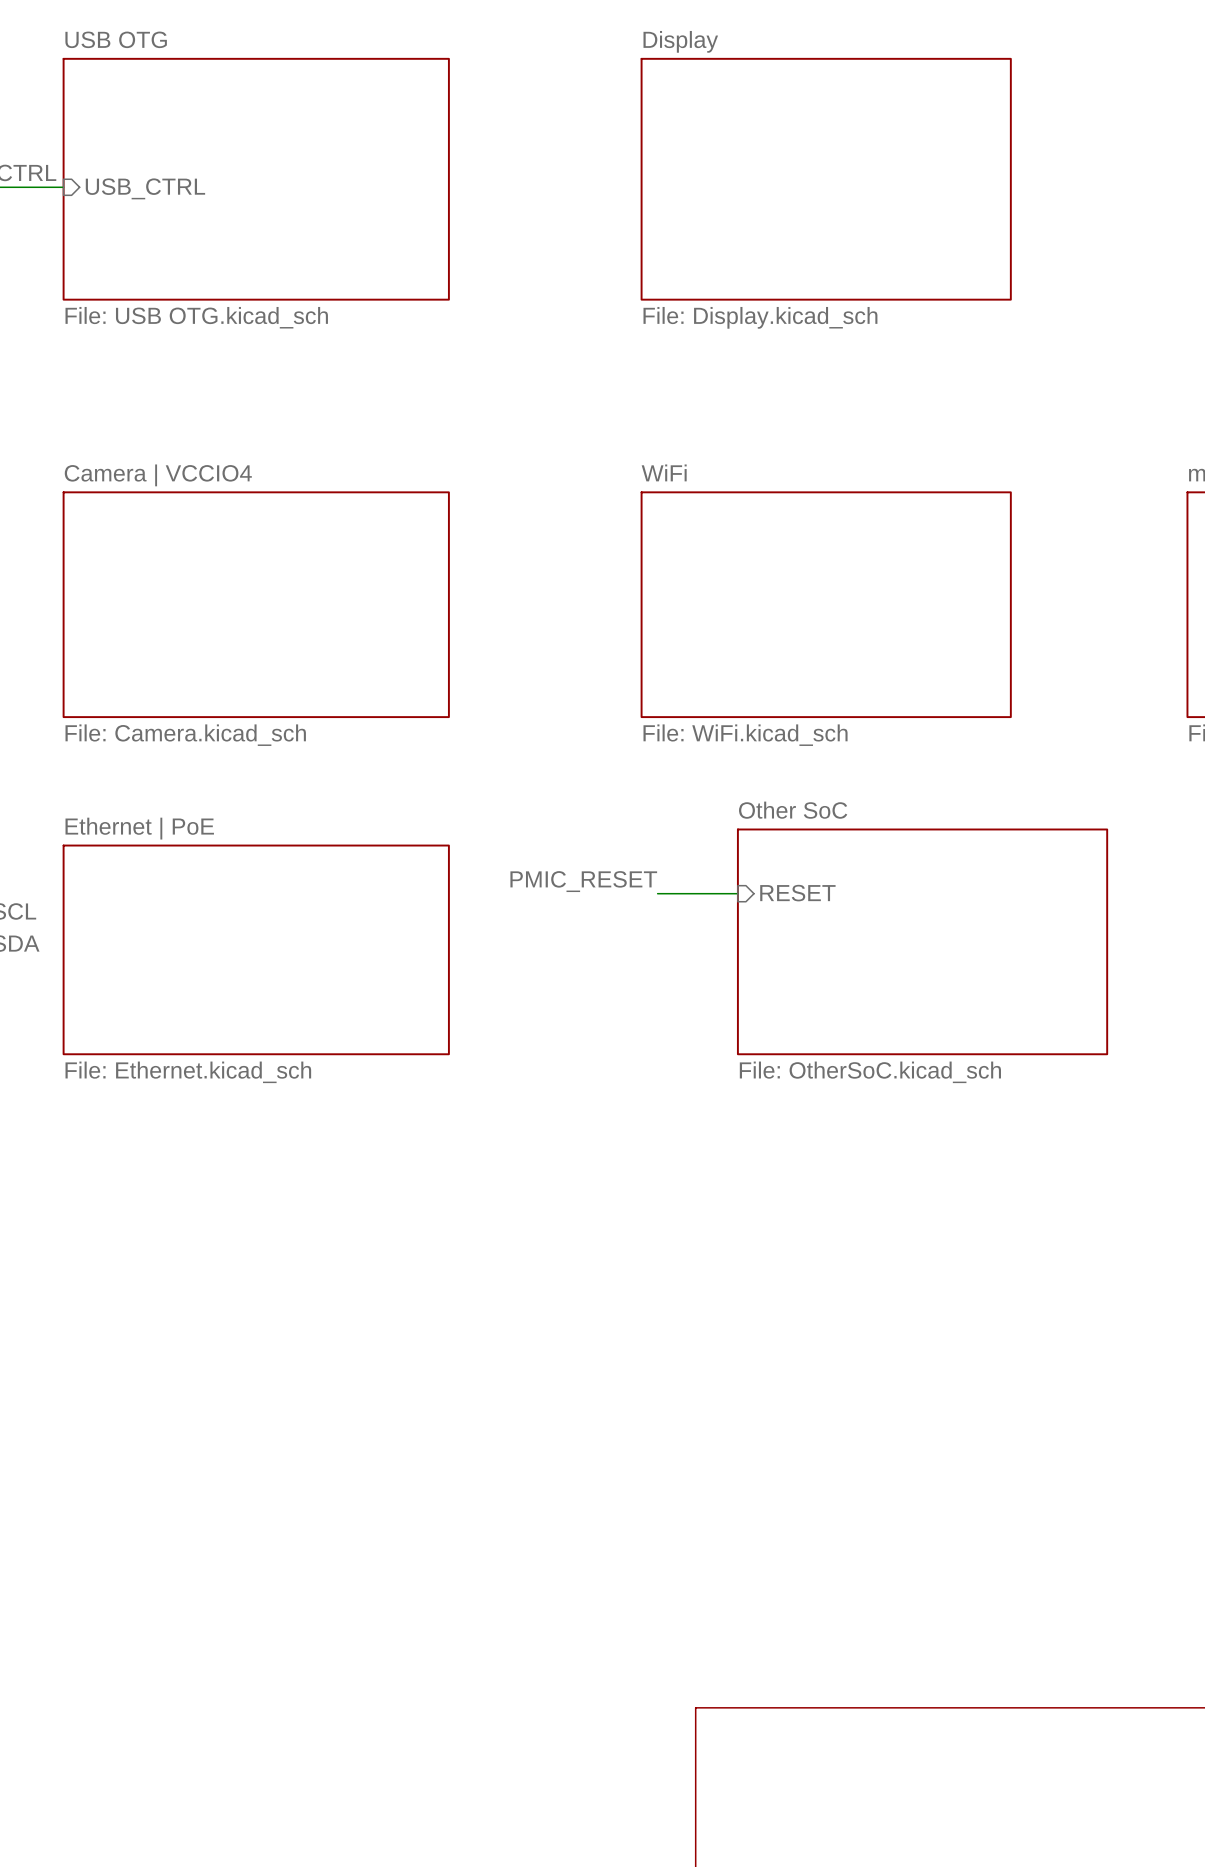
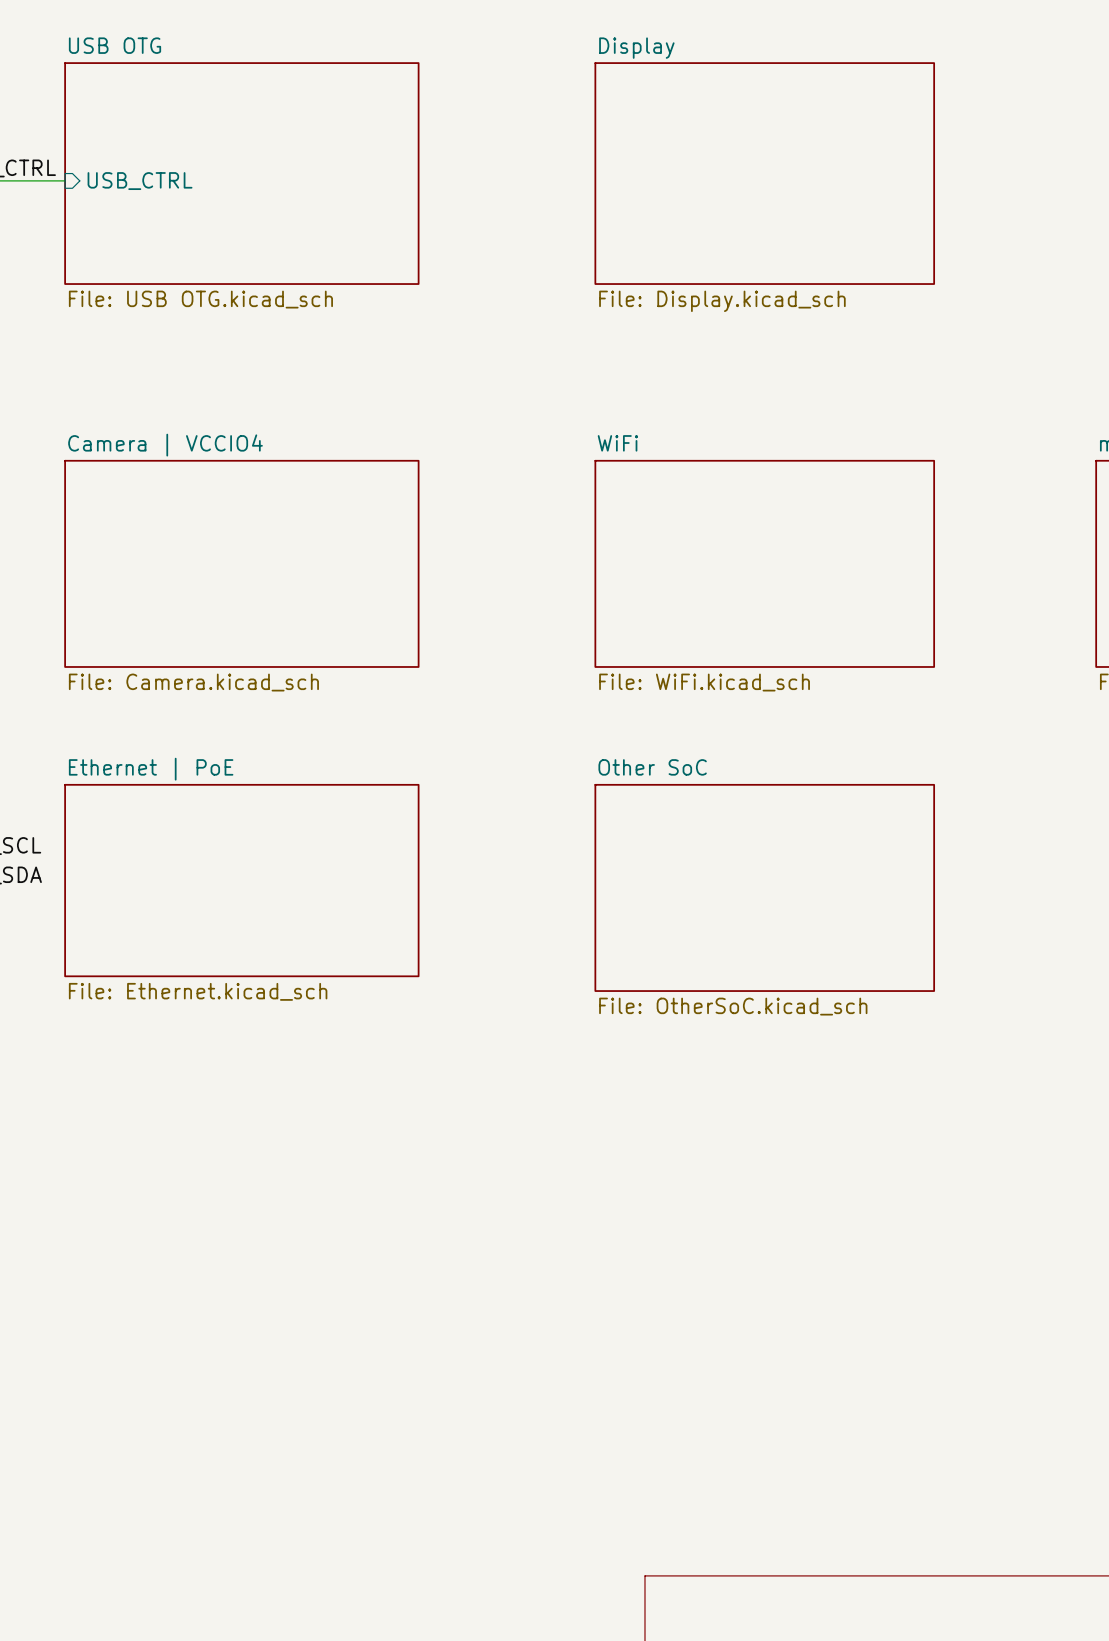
label: PMIC_RESET (583, 881) -> none
wire: (657, 893) (737, 893) -> none
sheet pin: RESET (797, 893) -> none
sheet Other SoC position: (922, 941) -> (764, 887)

